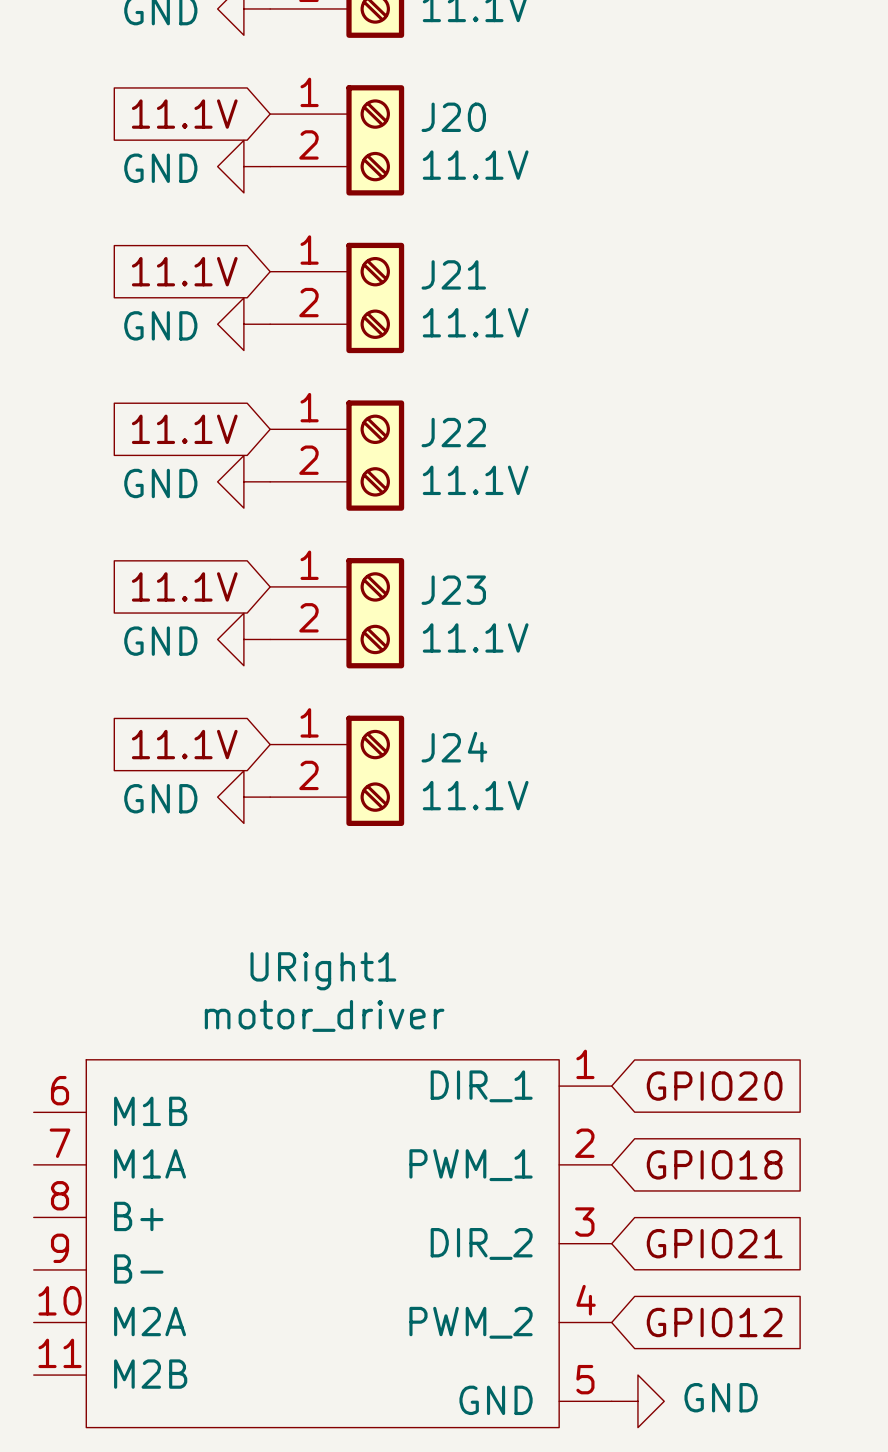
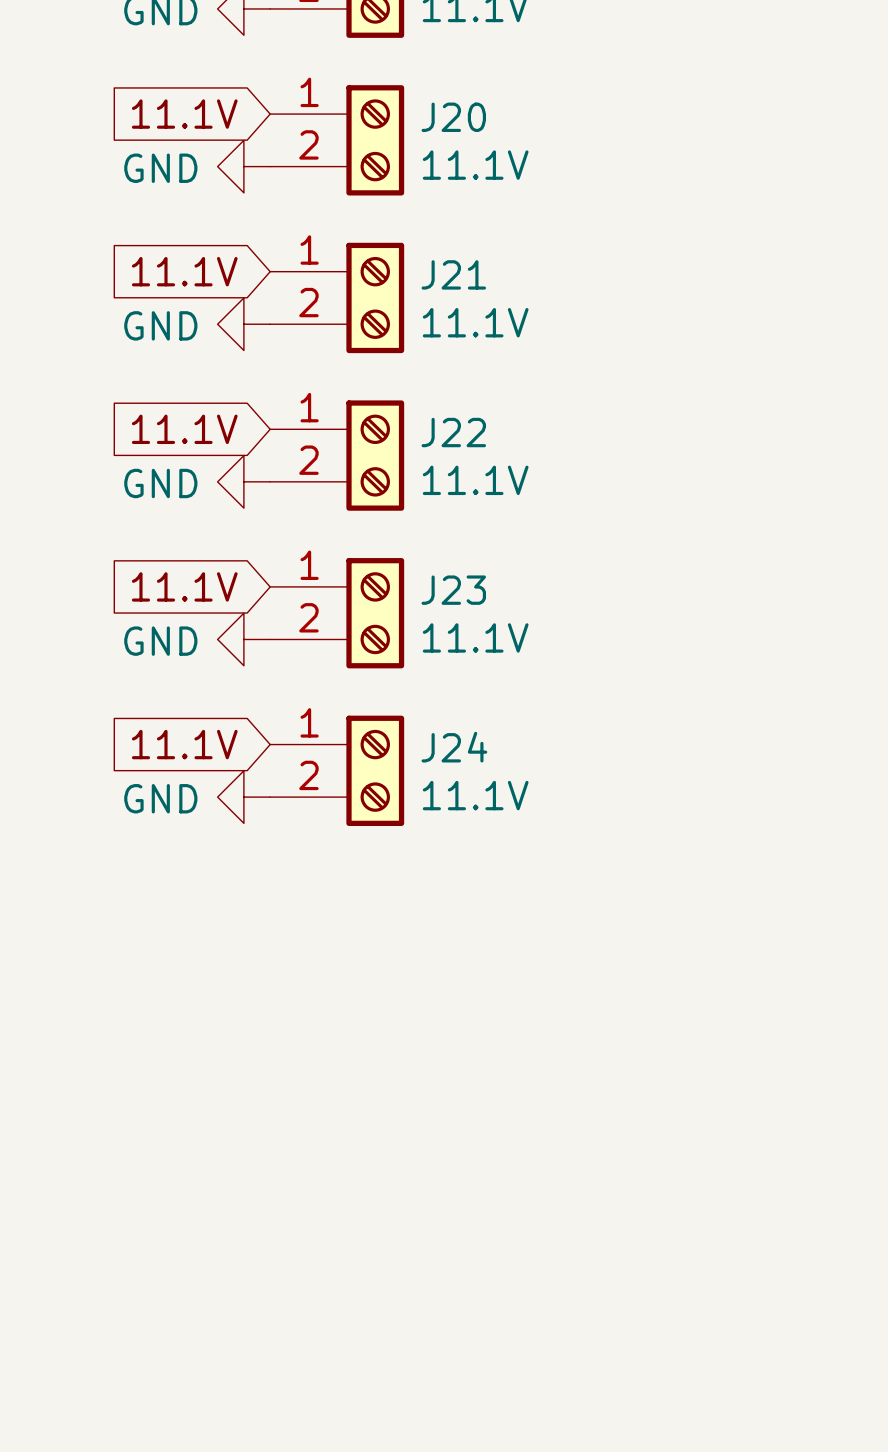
global label: GPIO20 (714, 1086) -> none
global label: GPIO18 (714, 1164) -> none
URight1: motor_driver (322, 1243) -> none
global label: GPIO21 (714, 1243) -> none
global label: GPIO12 (714, 1322) -> none
power symbol: GND (637, 1401) -> none

